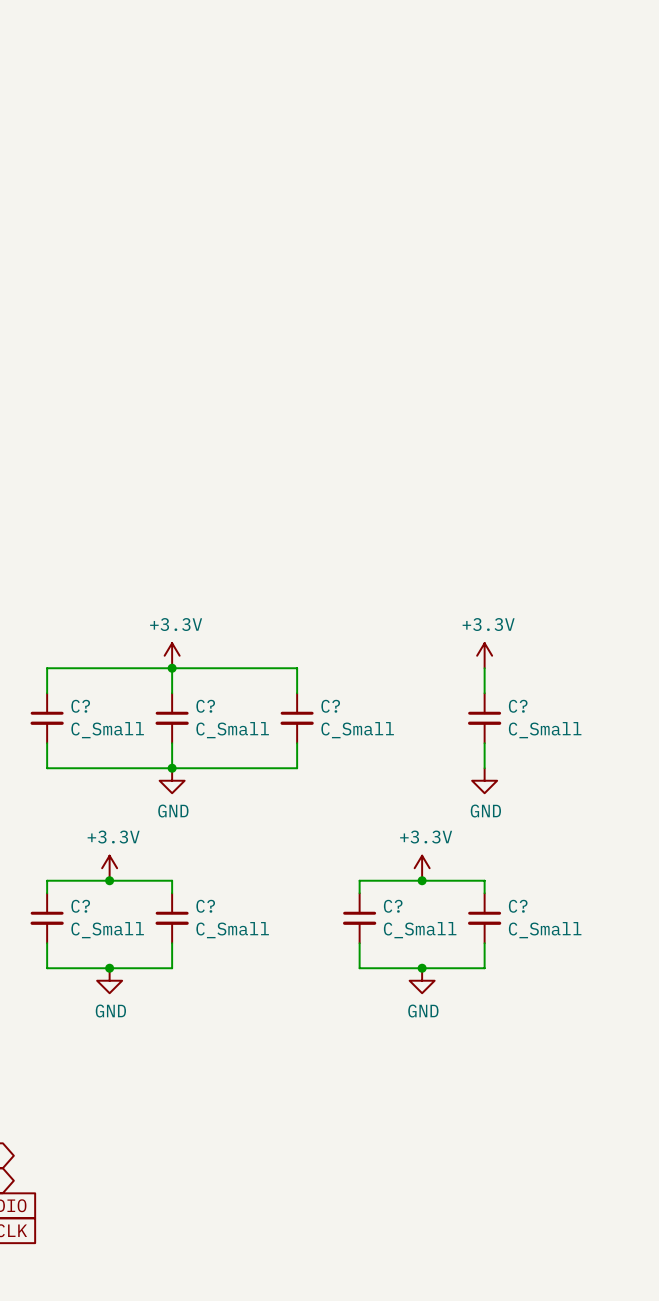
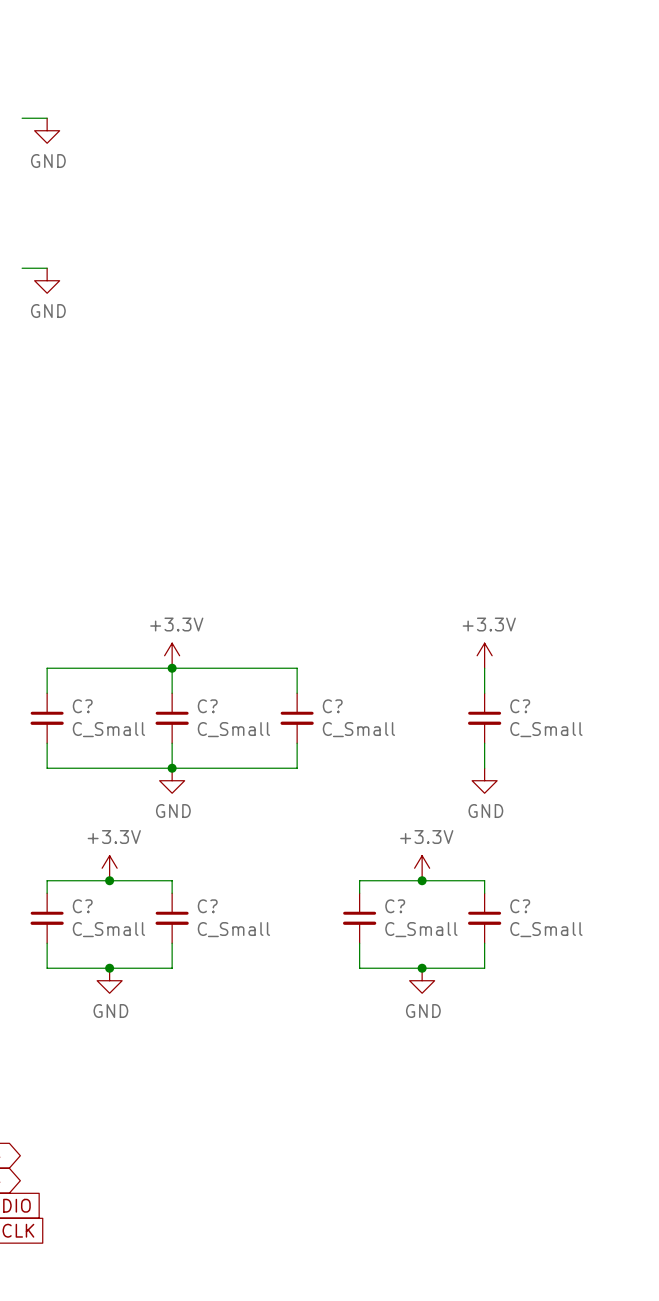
wire: none -> (22, 118) (47, 118)
power symbol: none -> GND (47, 130)
wire: none -> (22, 268) (47, 268)
power symbol: none -> GND (47, 280)

